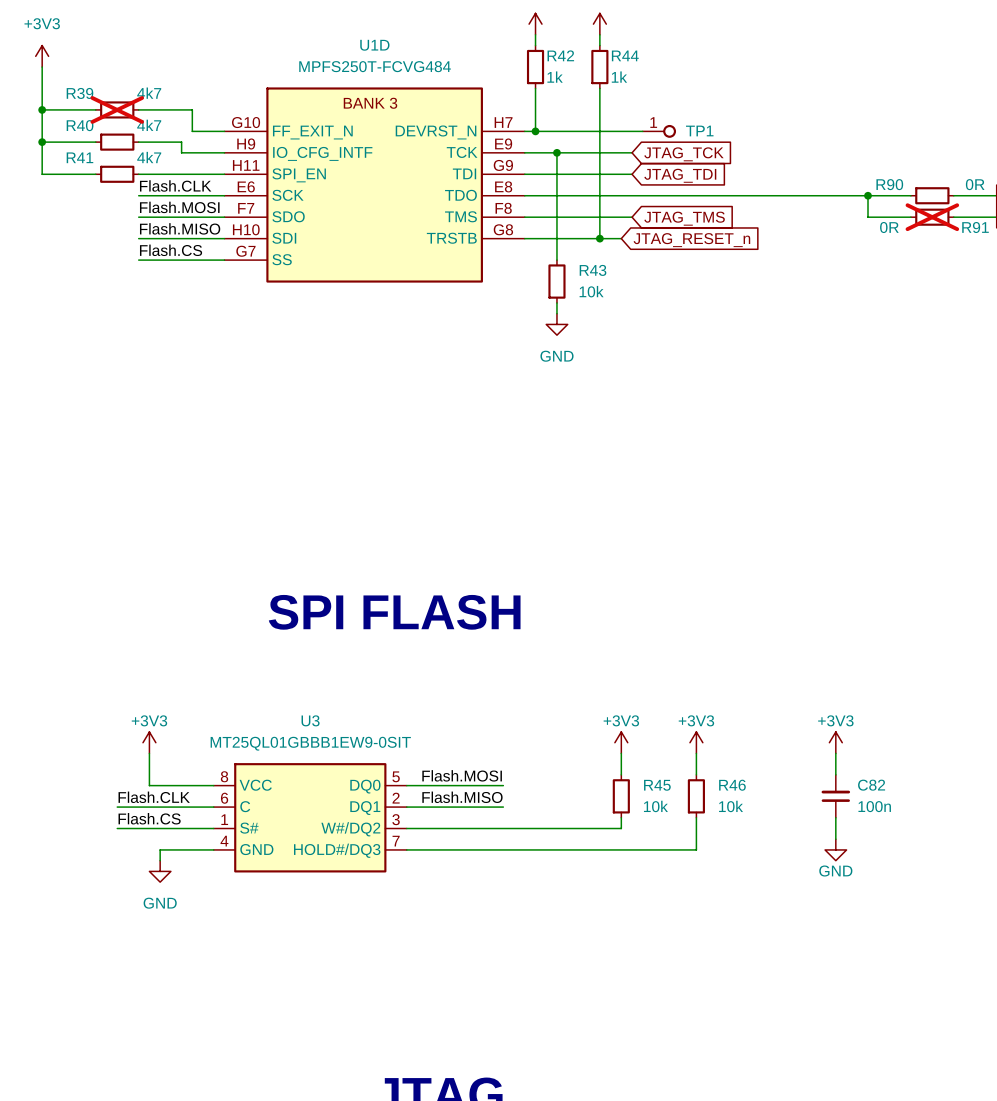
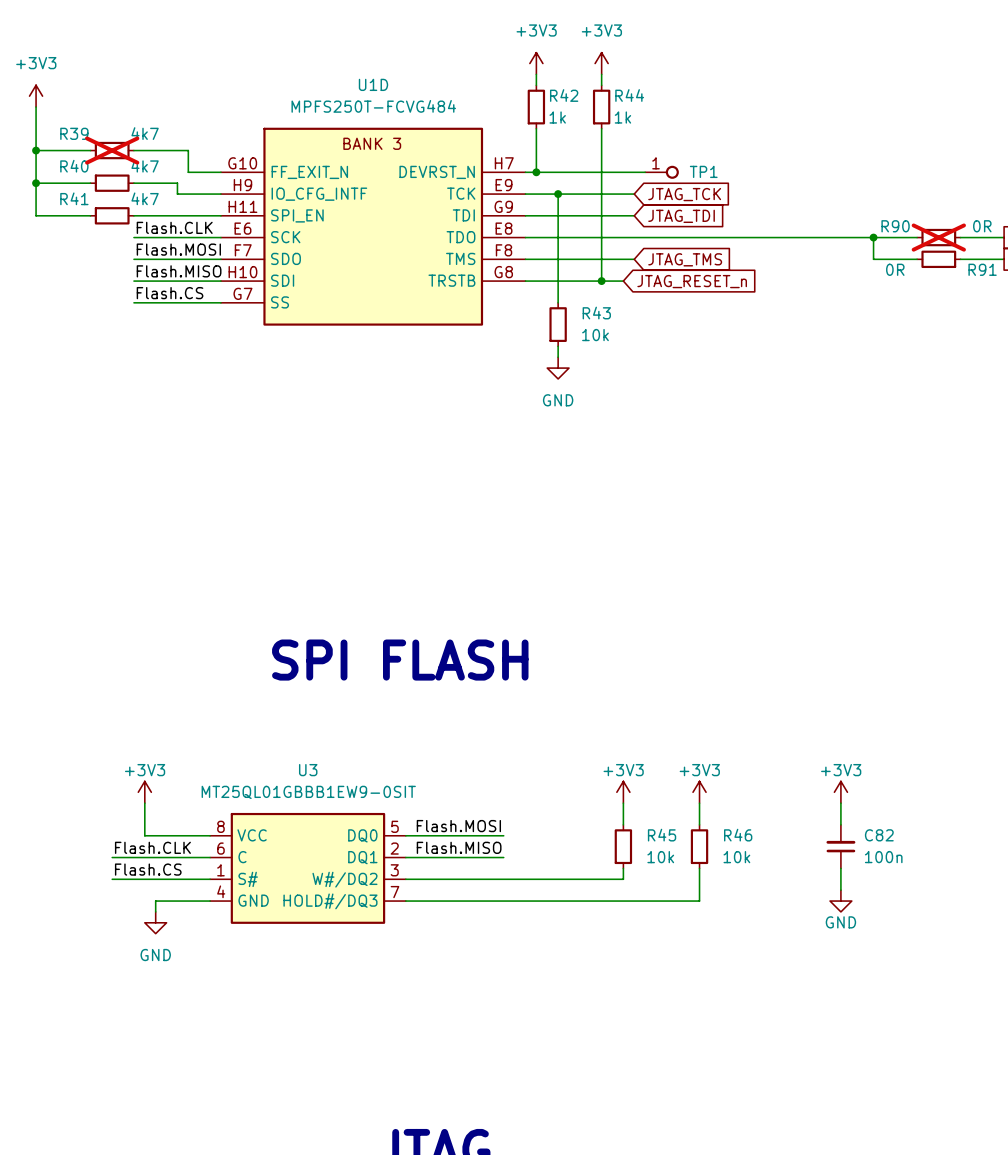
R90 do-not-place cross: none -> (938, 237)
R91 do-not-place cross: (932, 217) -> none

